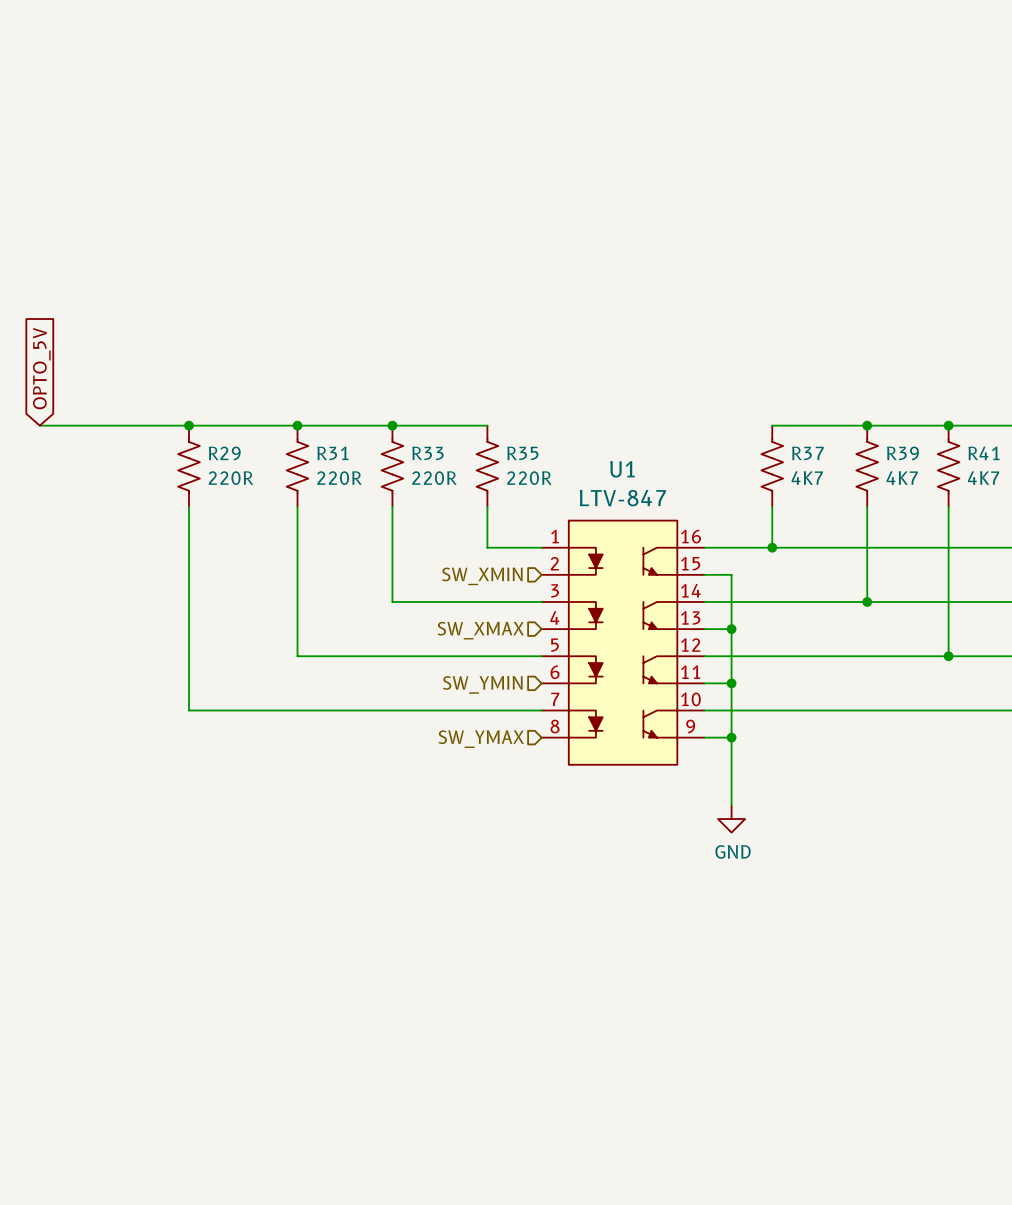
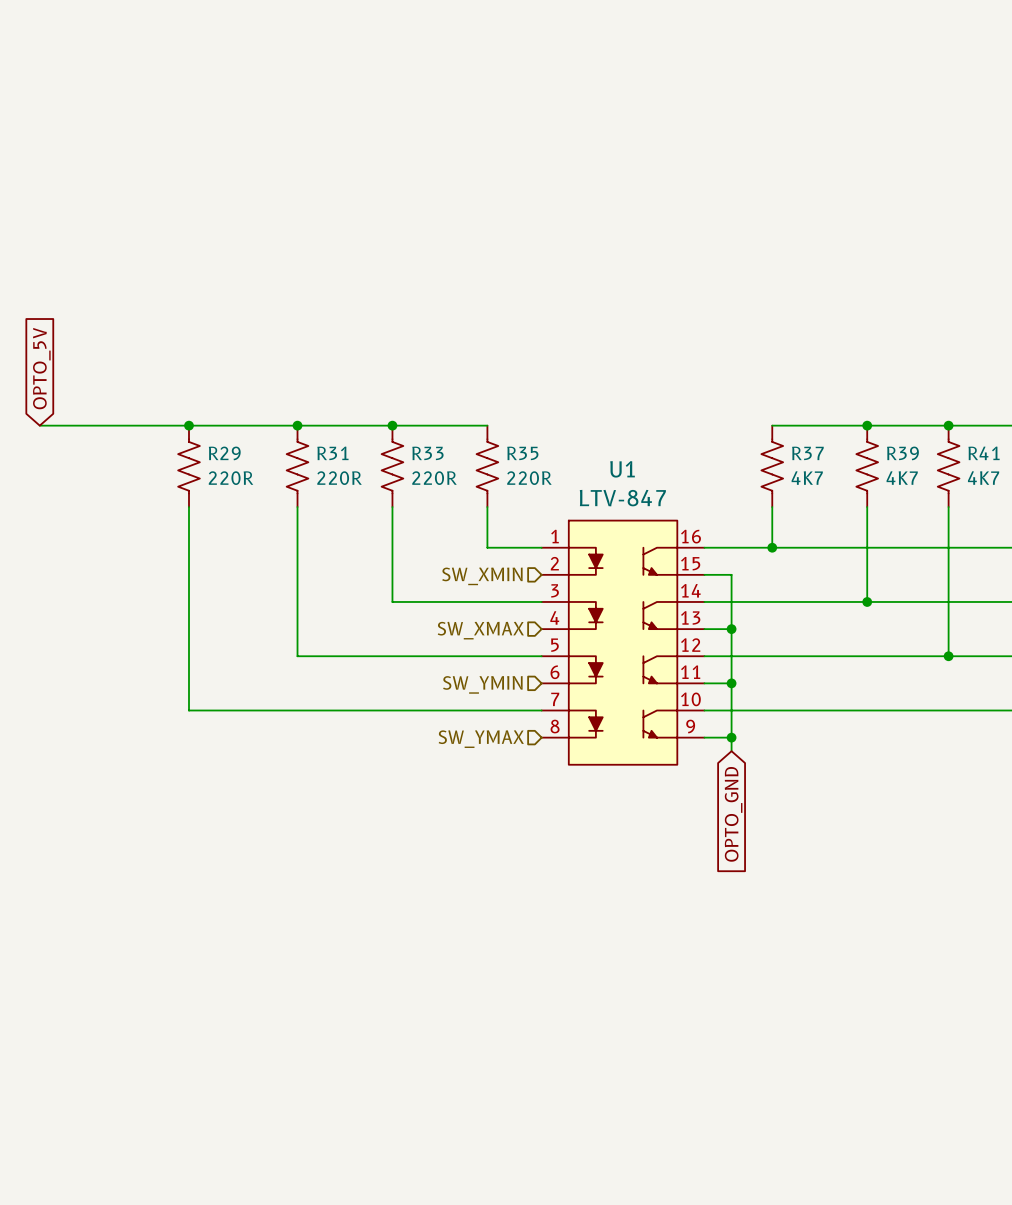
wire: (731, 751) (731, 805) -> none
global label: none -> OPTO_GND (733, 814)
power symbol: GND (731, 819) -> none

